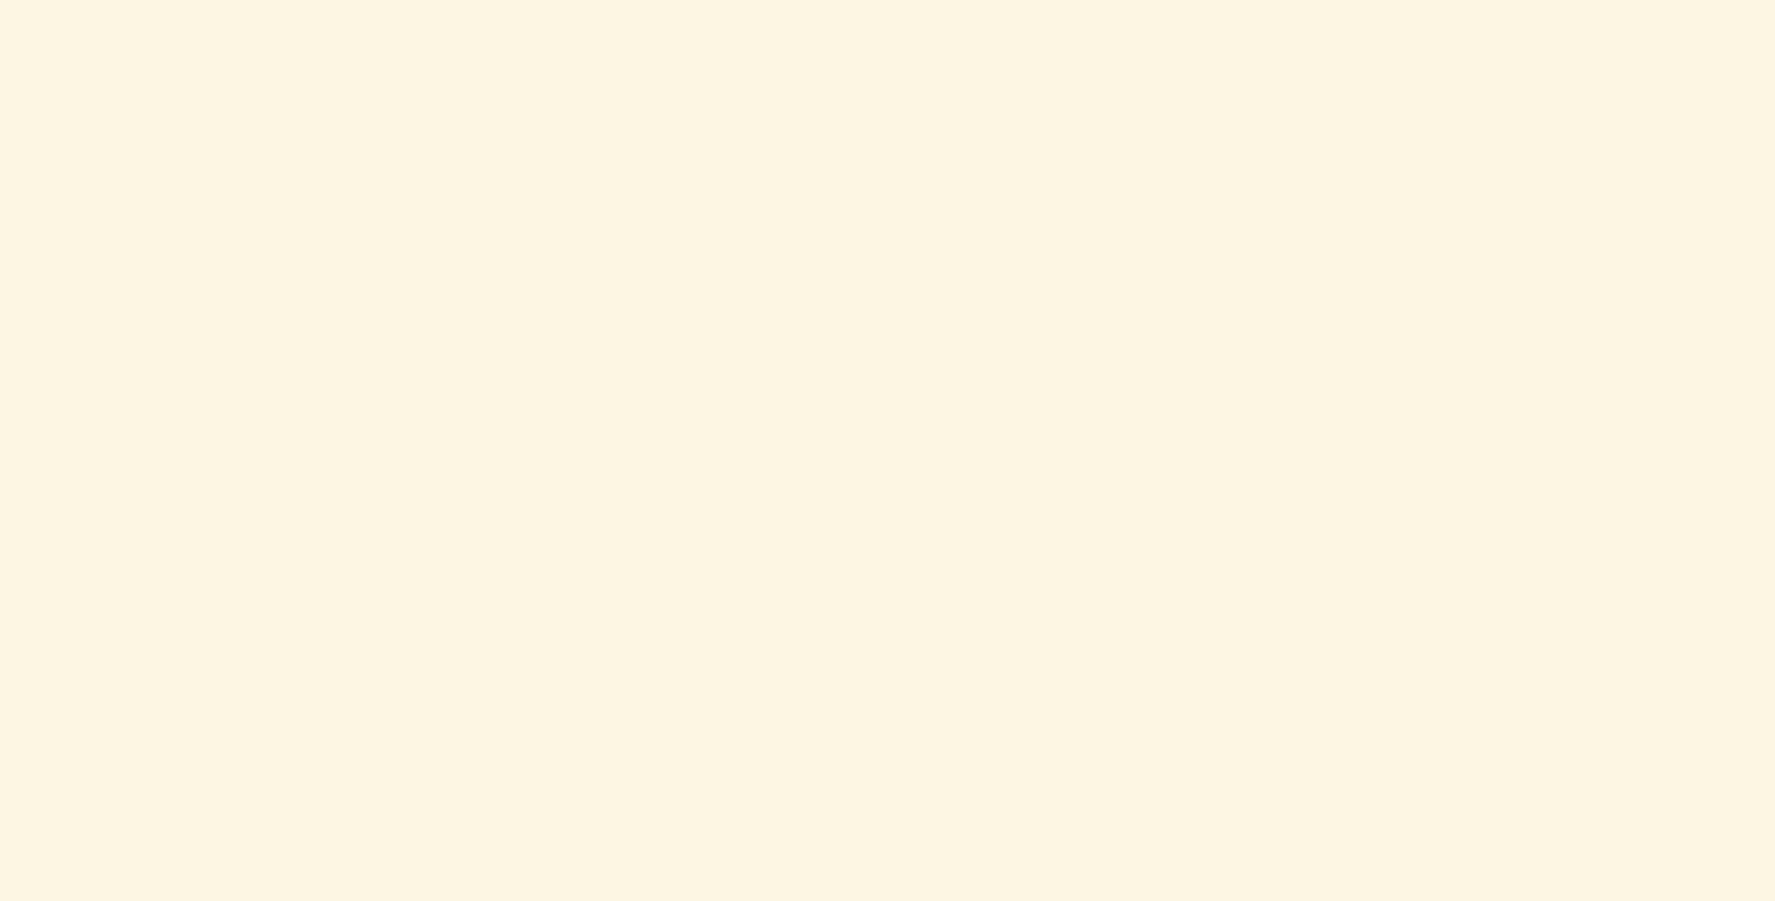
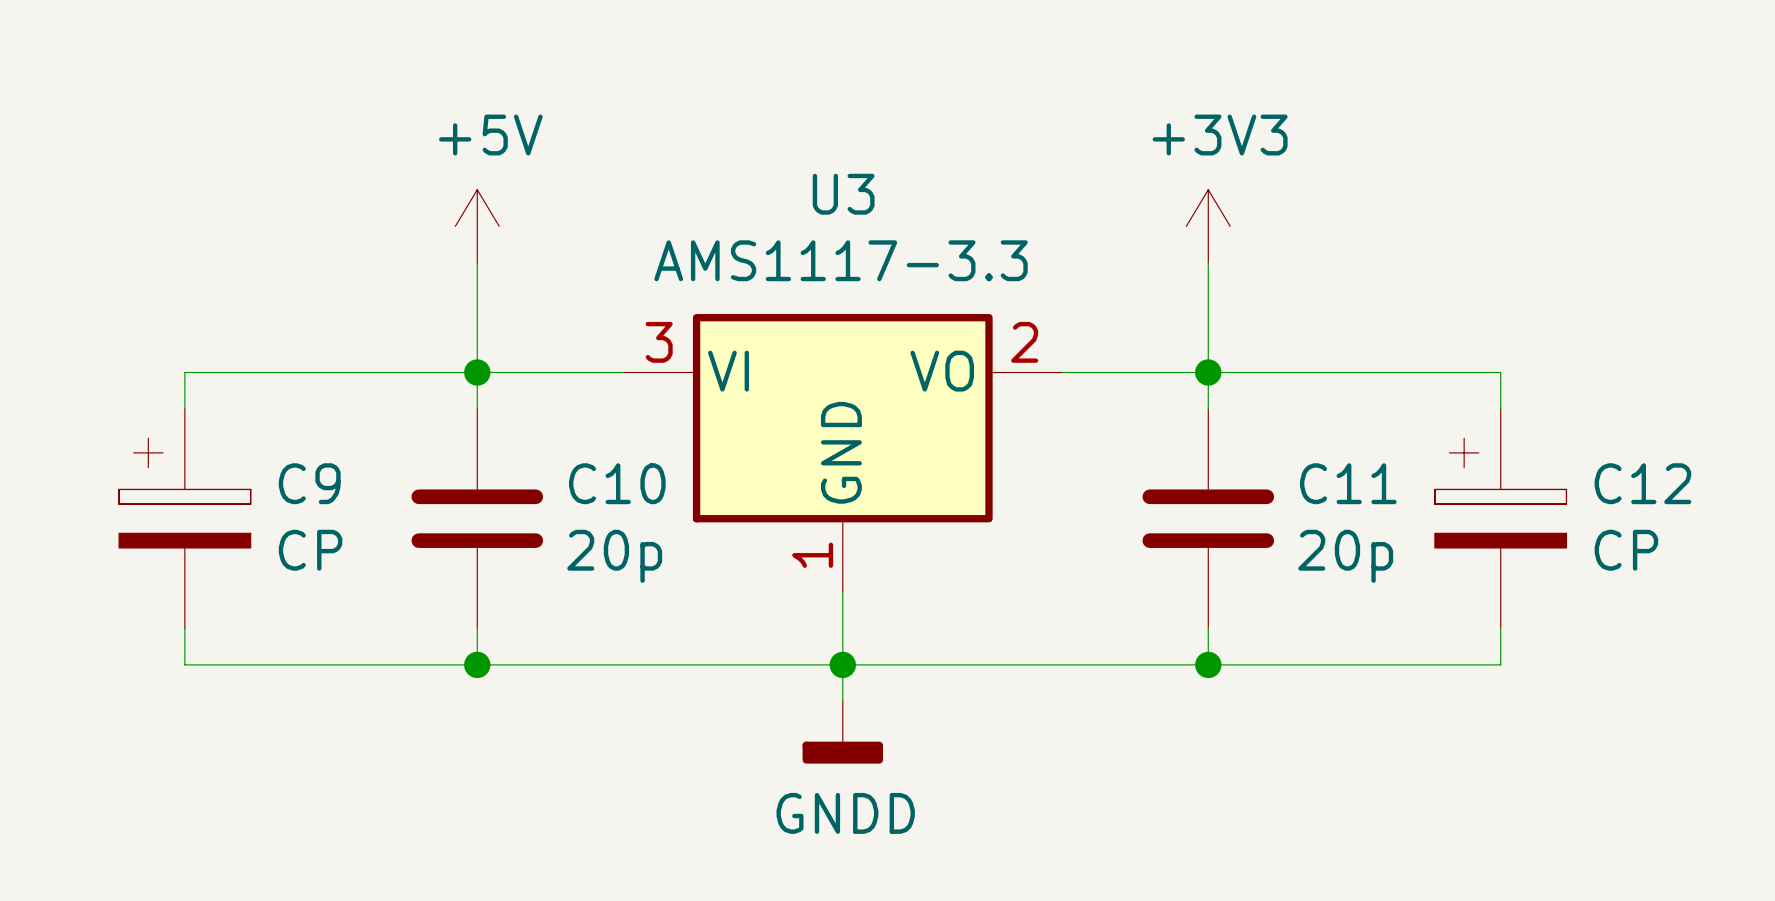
power symbol: none -> +5V (477, 226)
power symbol: none -> +3V3 (1208, 226)
wire: none -> (477, 262) (477, 409)
wire: none -> (1208, 262) (1208, 409)
junction: none -> (477, 372)
wire: none -> (623, 372) (184, 372) (184, 409)
wire: none -> (1062, 372) (1500, 372) (1500, 409)
junction: none -> (1208, 372)
U3: none -> AMS1117-3.3 (842, 452)
C9: none -> CP (184, 518)
C10: none -> 20p (477, 518)
C11: none -> 20p (1208, 518)
C12: none -> CP (1500, 518)
wire: none -> (842, 591) (842, 701)
wire: none -> (184, 628) (184, 664) (1500, 664) (1500, 628)
wire: none -> (477, 628) (477, 664)
wire: none -> (1208, 628) (1208, 664)
junction: none -> (477, 664)
junction: none -> (842, 664)
junction: none -> (1208, 664)
power symbol: none -> GNDD (842, 732)

